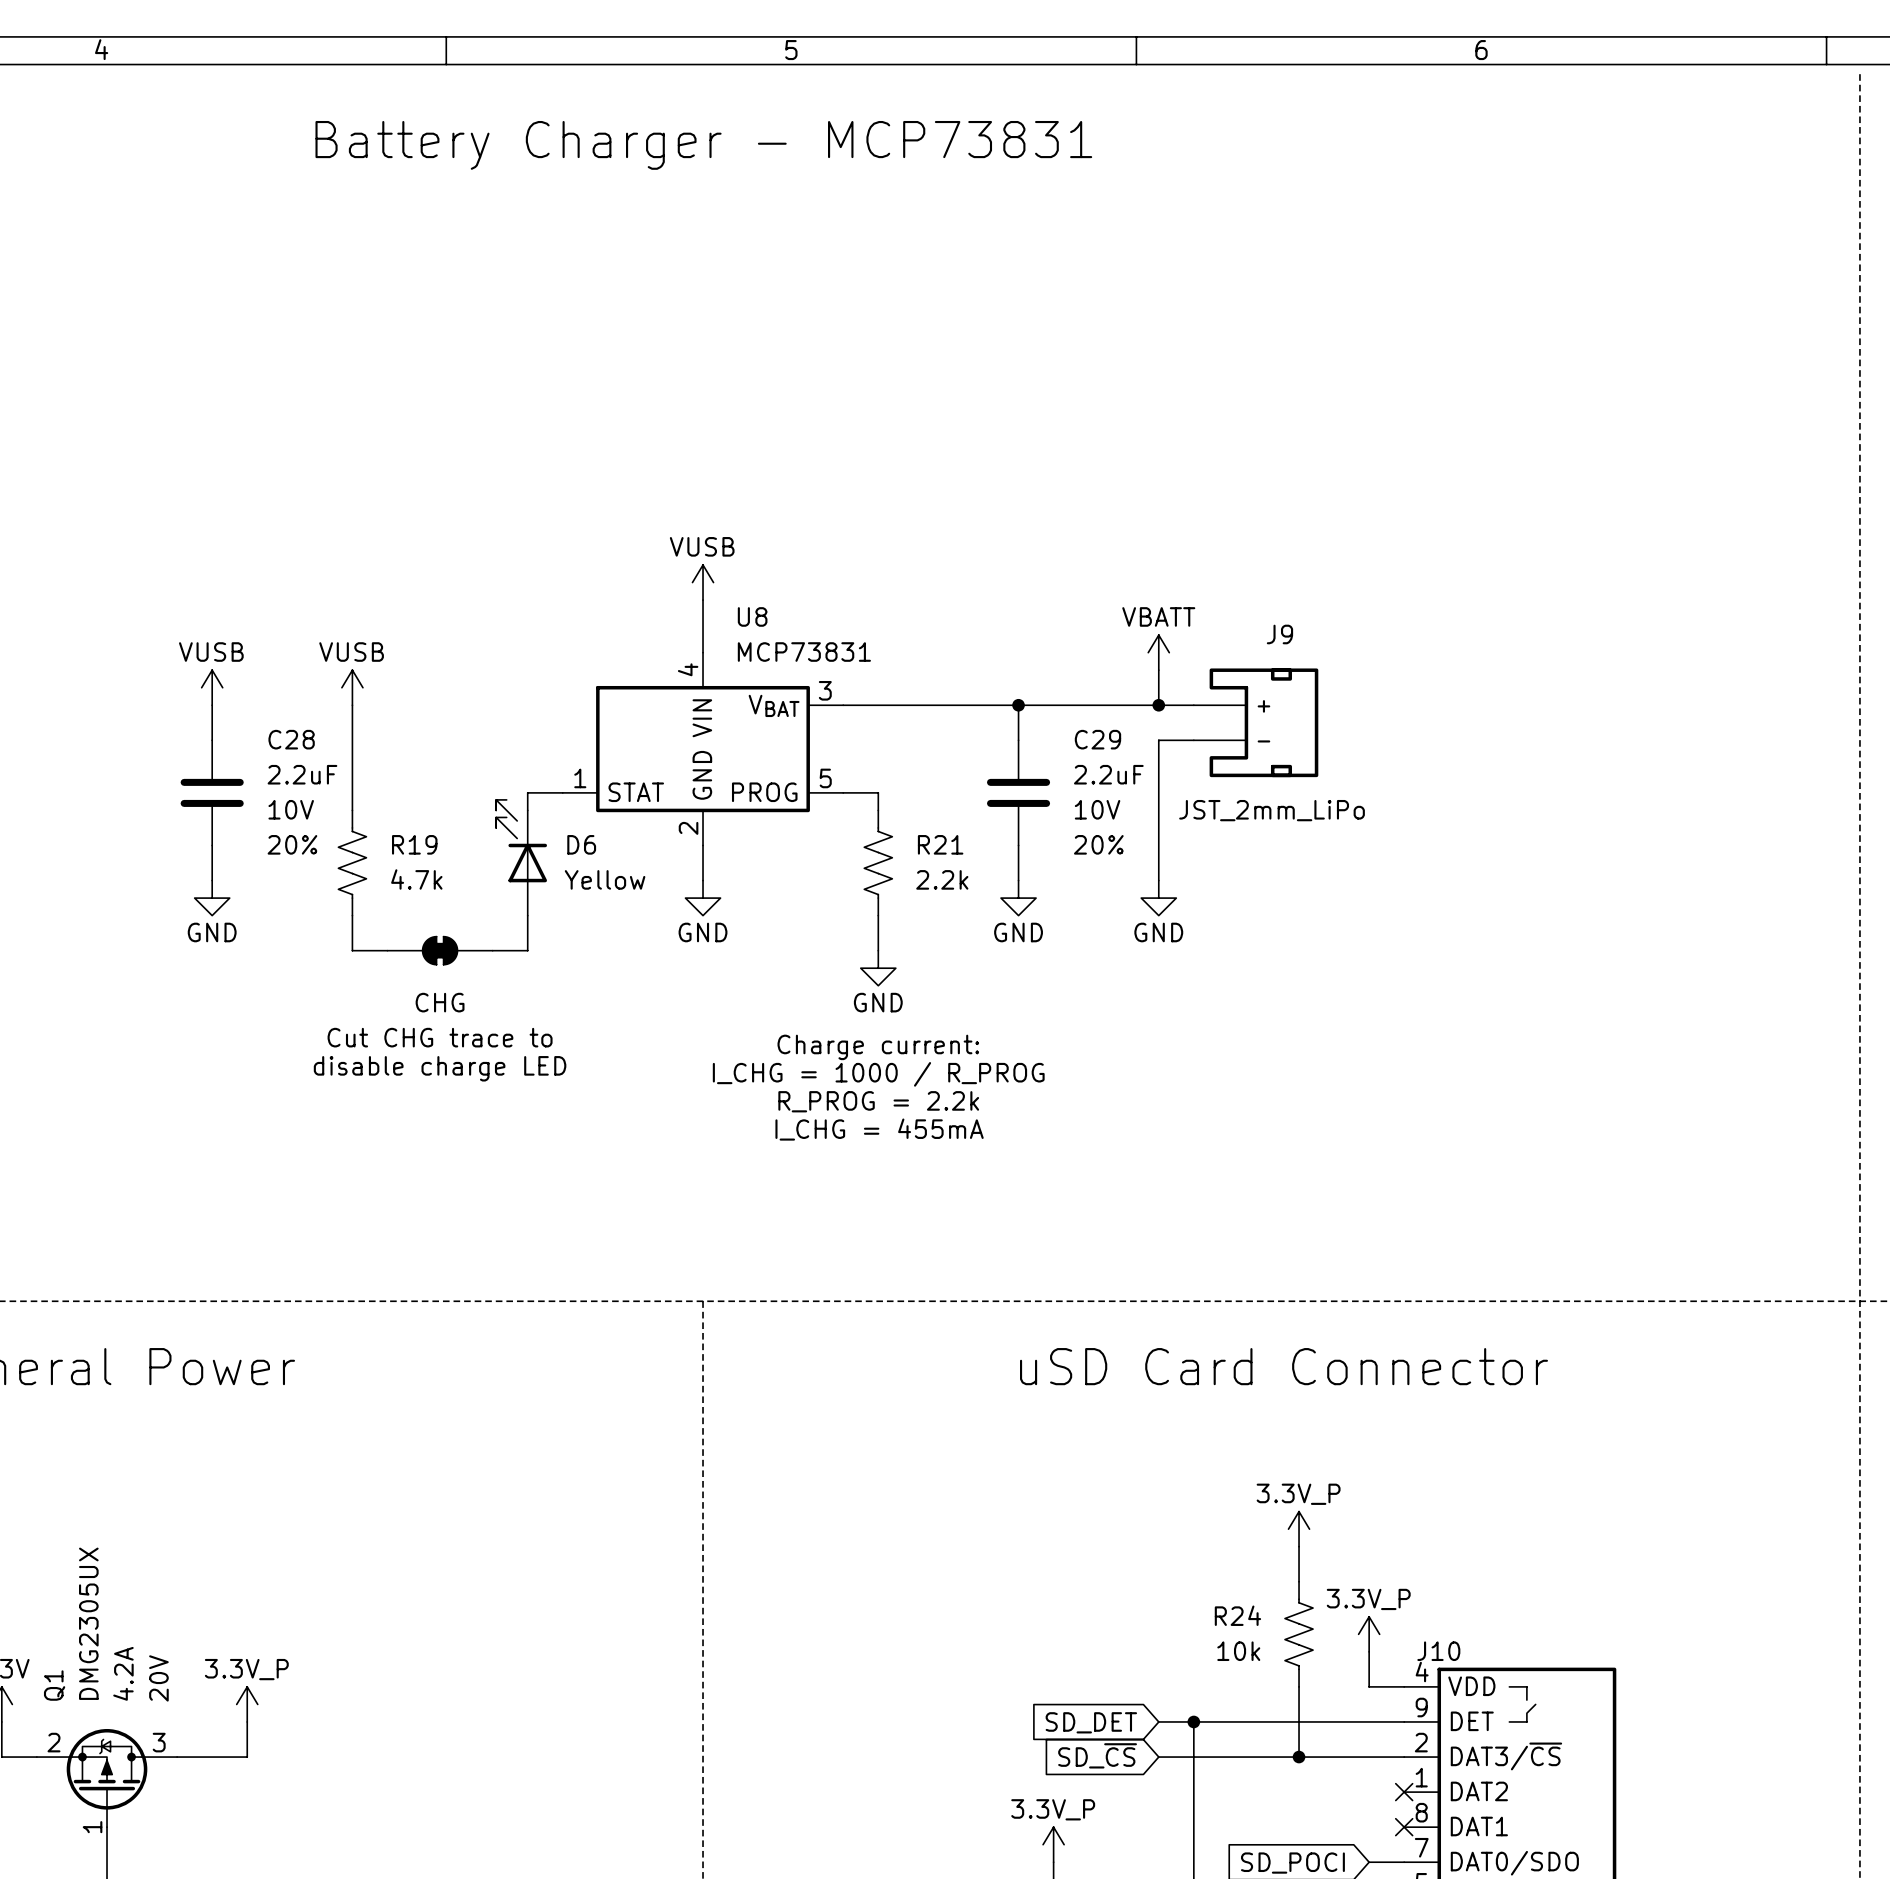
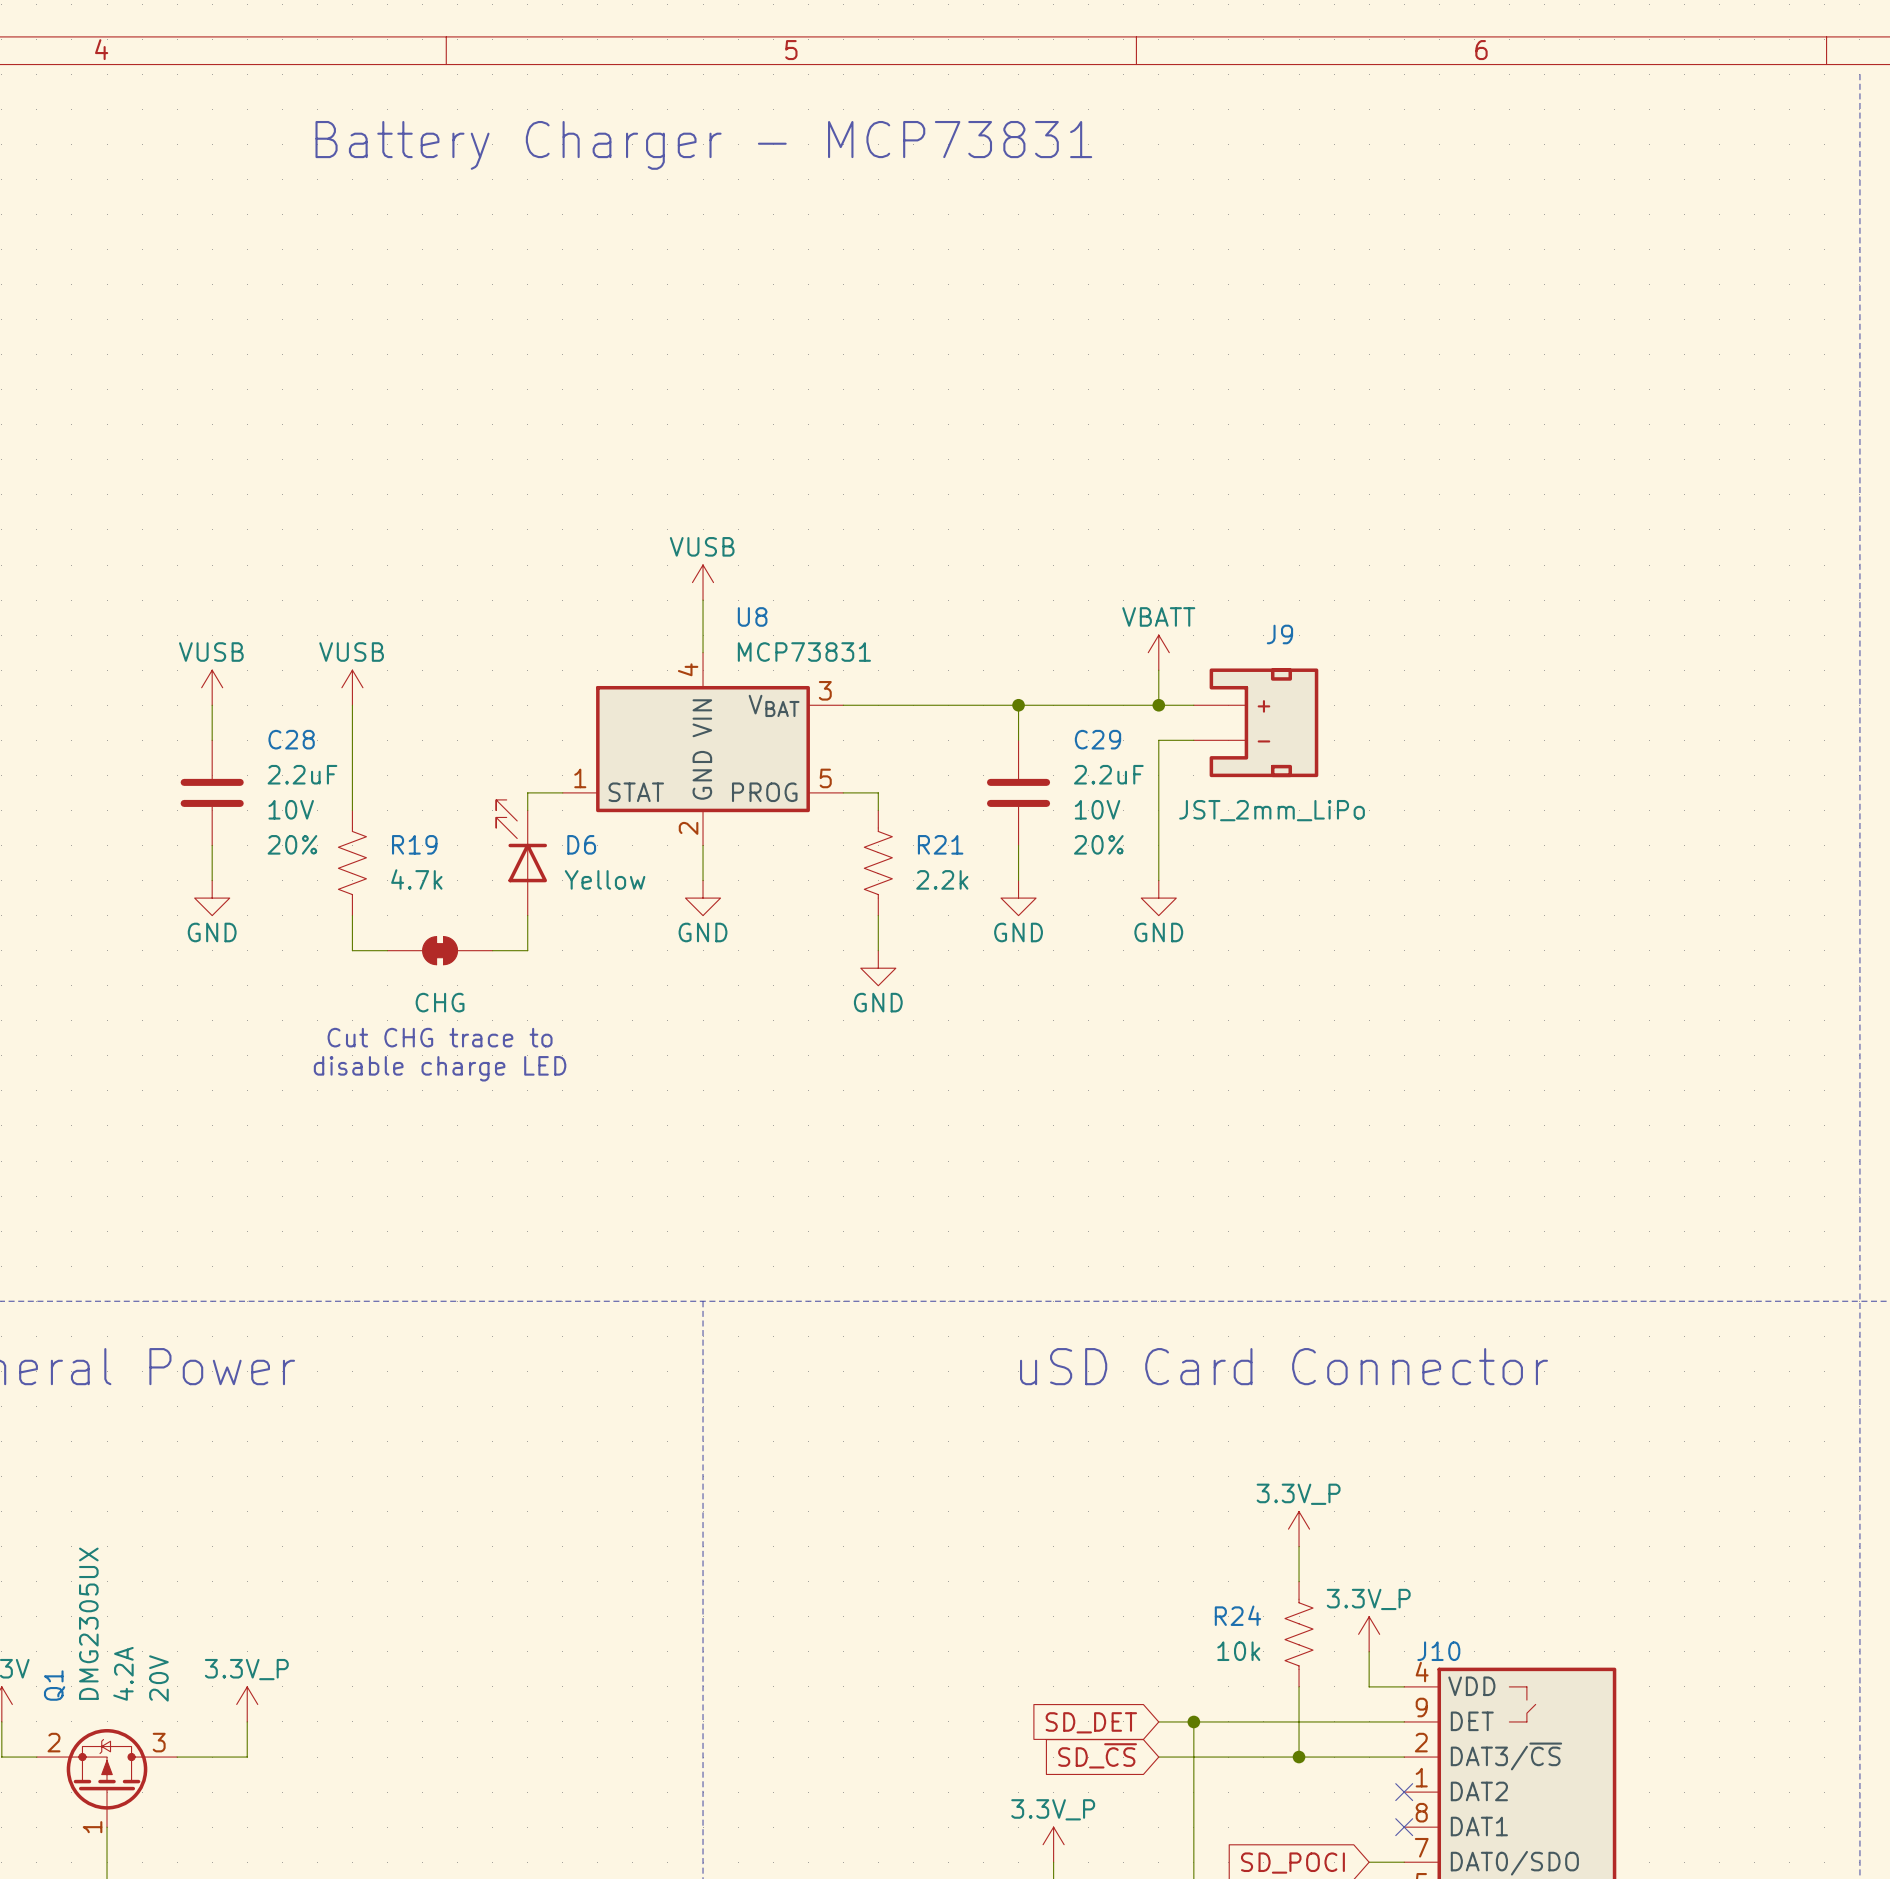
text: Charge current: (878, 1047) -> none
text: I_CHG = 1000 / R_PROG (878, 1074) -> none
text: R_PROG = 2.2k (878, 1101) -> none
text: I_CHG = 455mA (879, 1129) -> none

